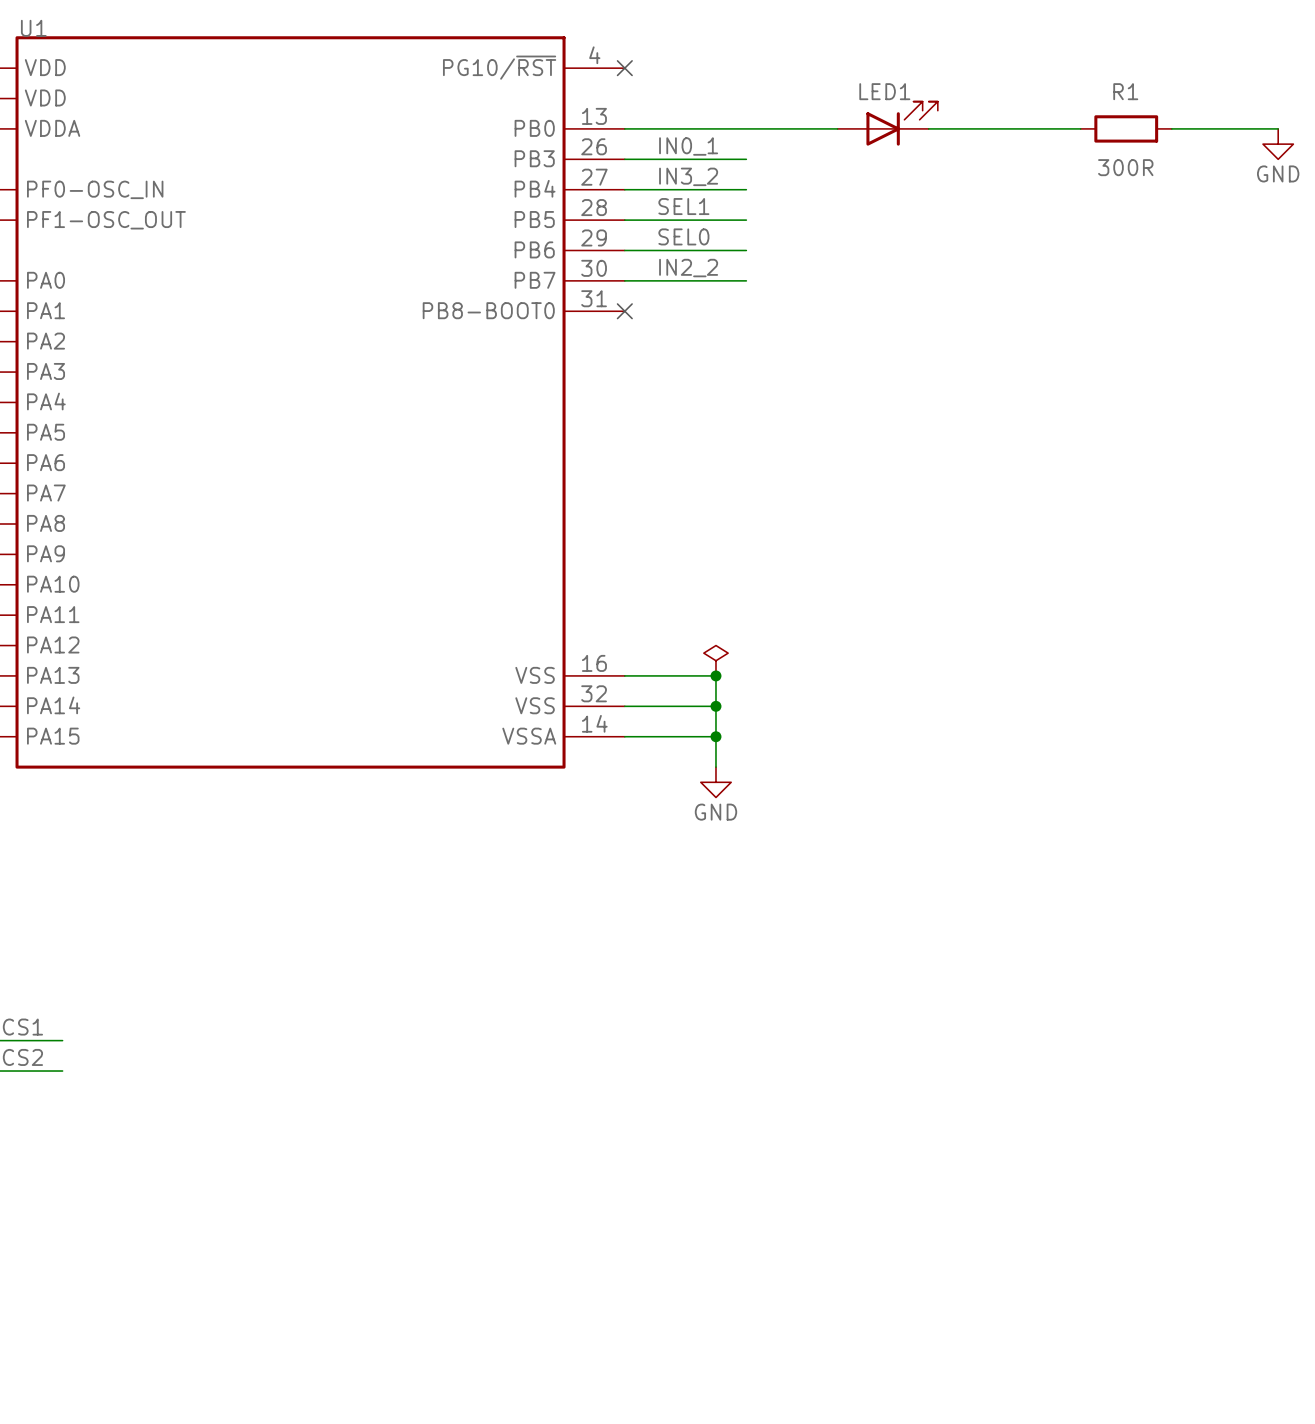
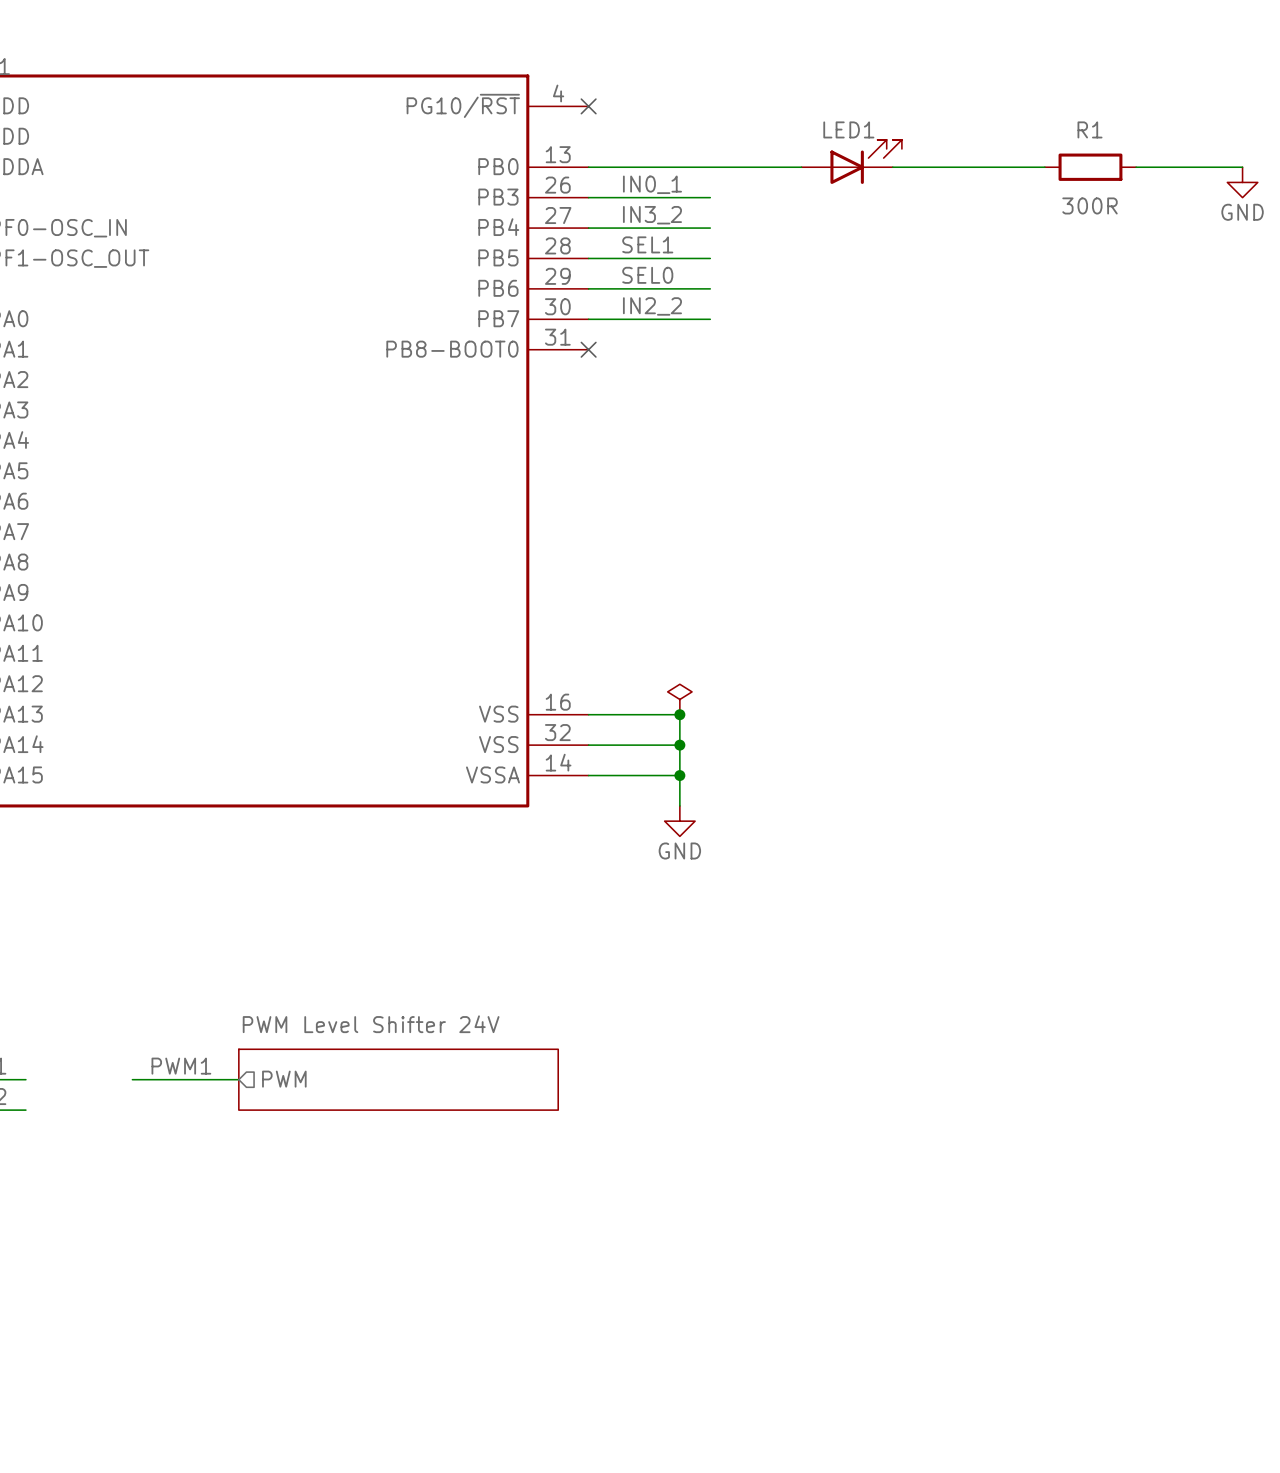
label: none -> PWM1 (181, 1066)
wire: none -> (132, 1079) (238, 1079)
sheet pin: none -> PWM (284, 1079)
sheet PWM Level Shifter 24V: none -> (398, 1079)

